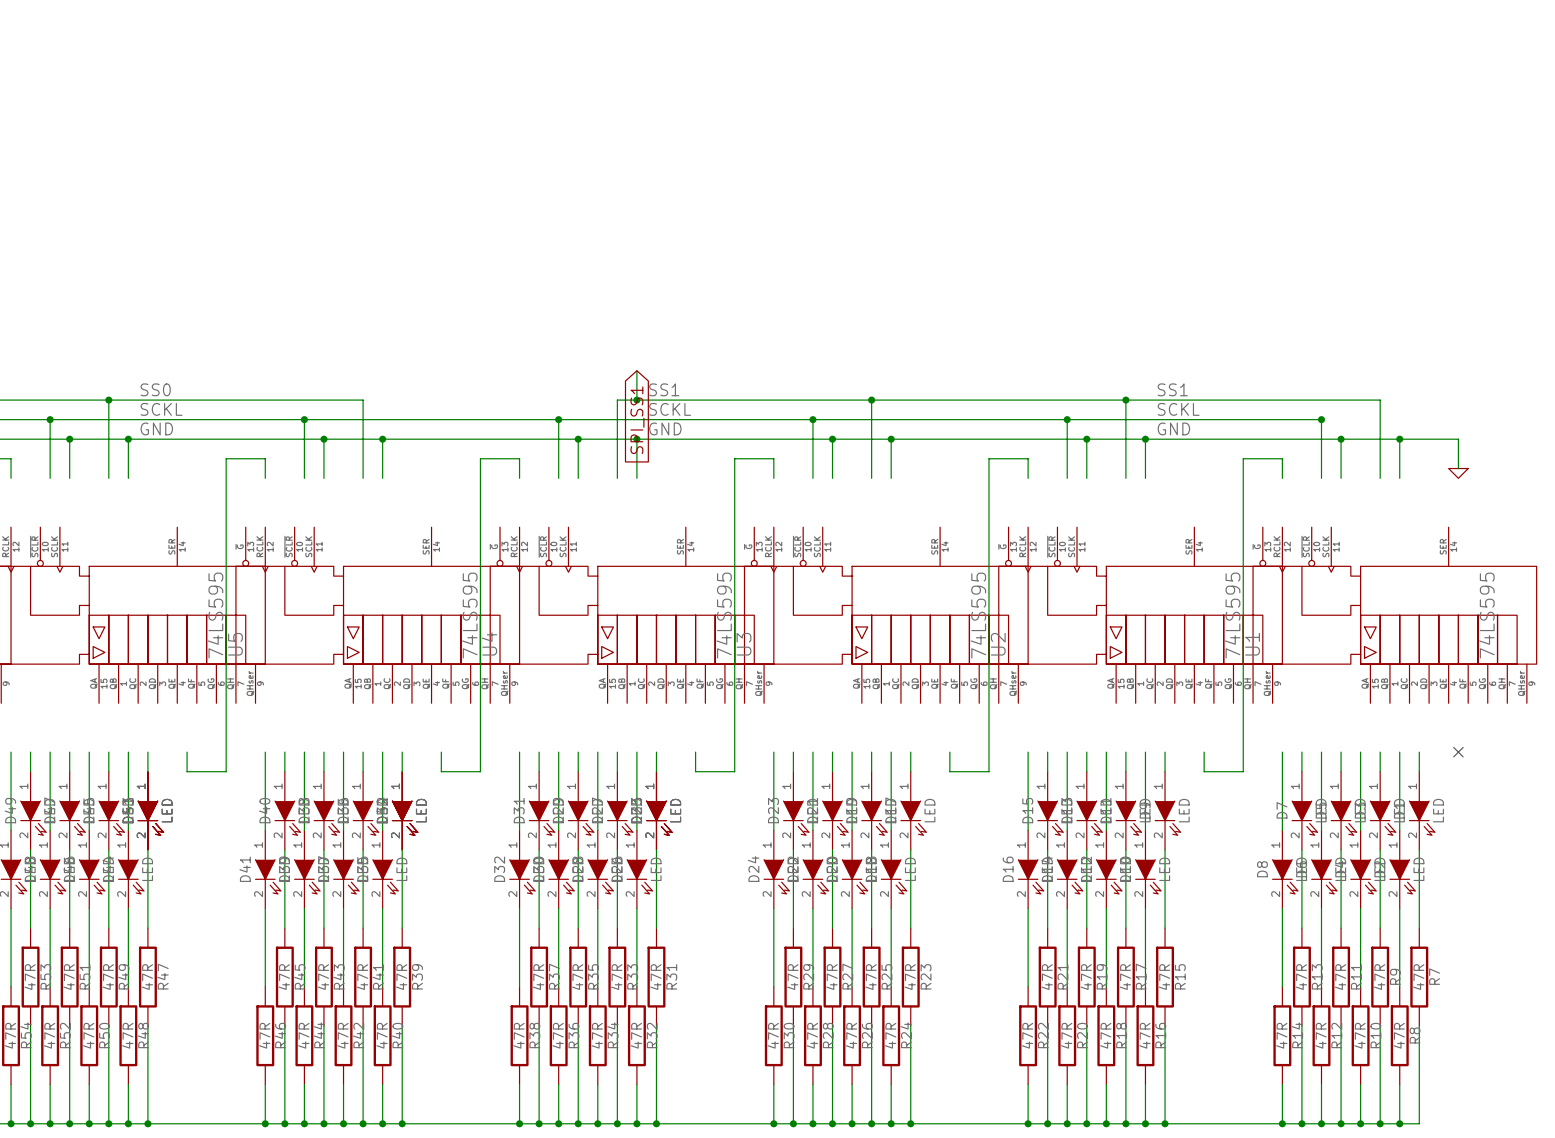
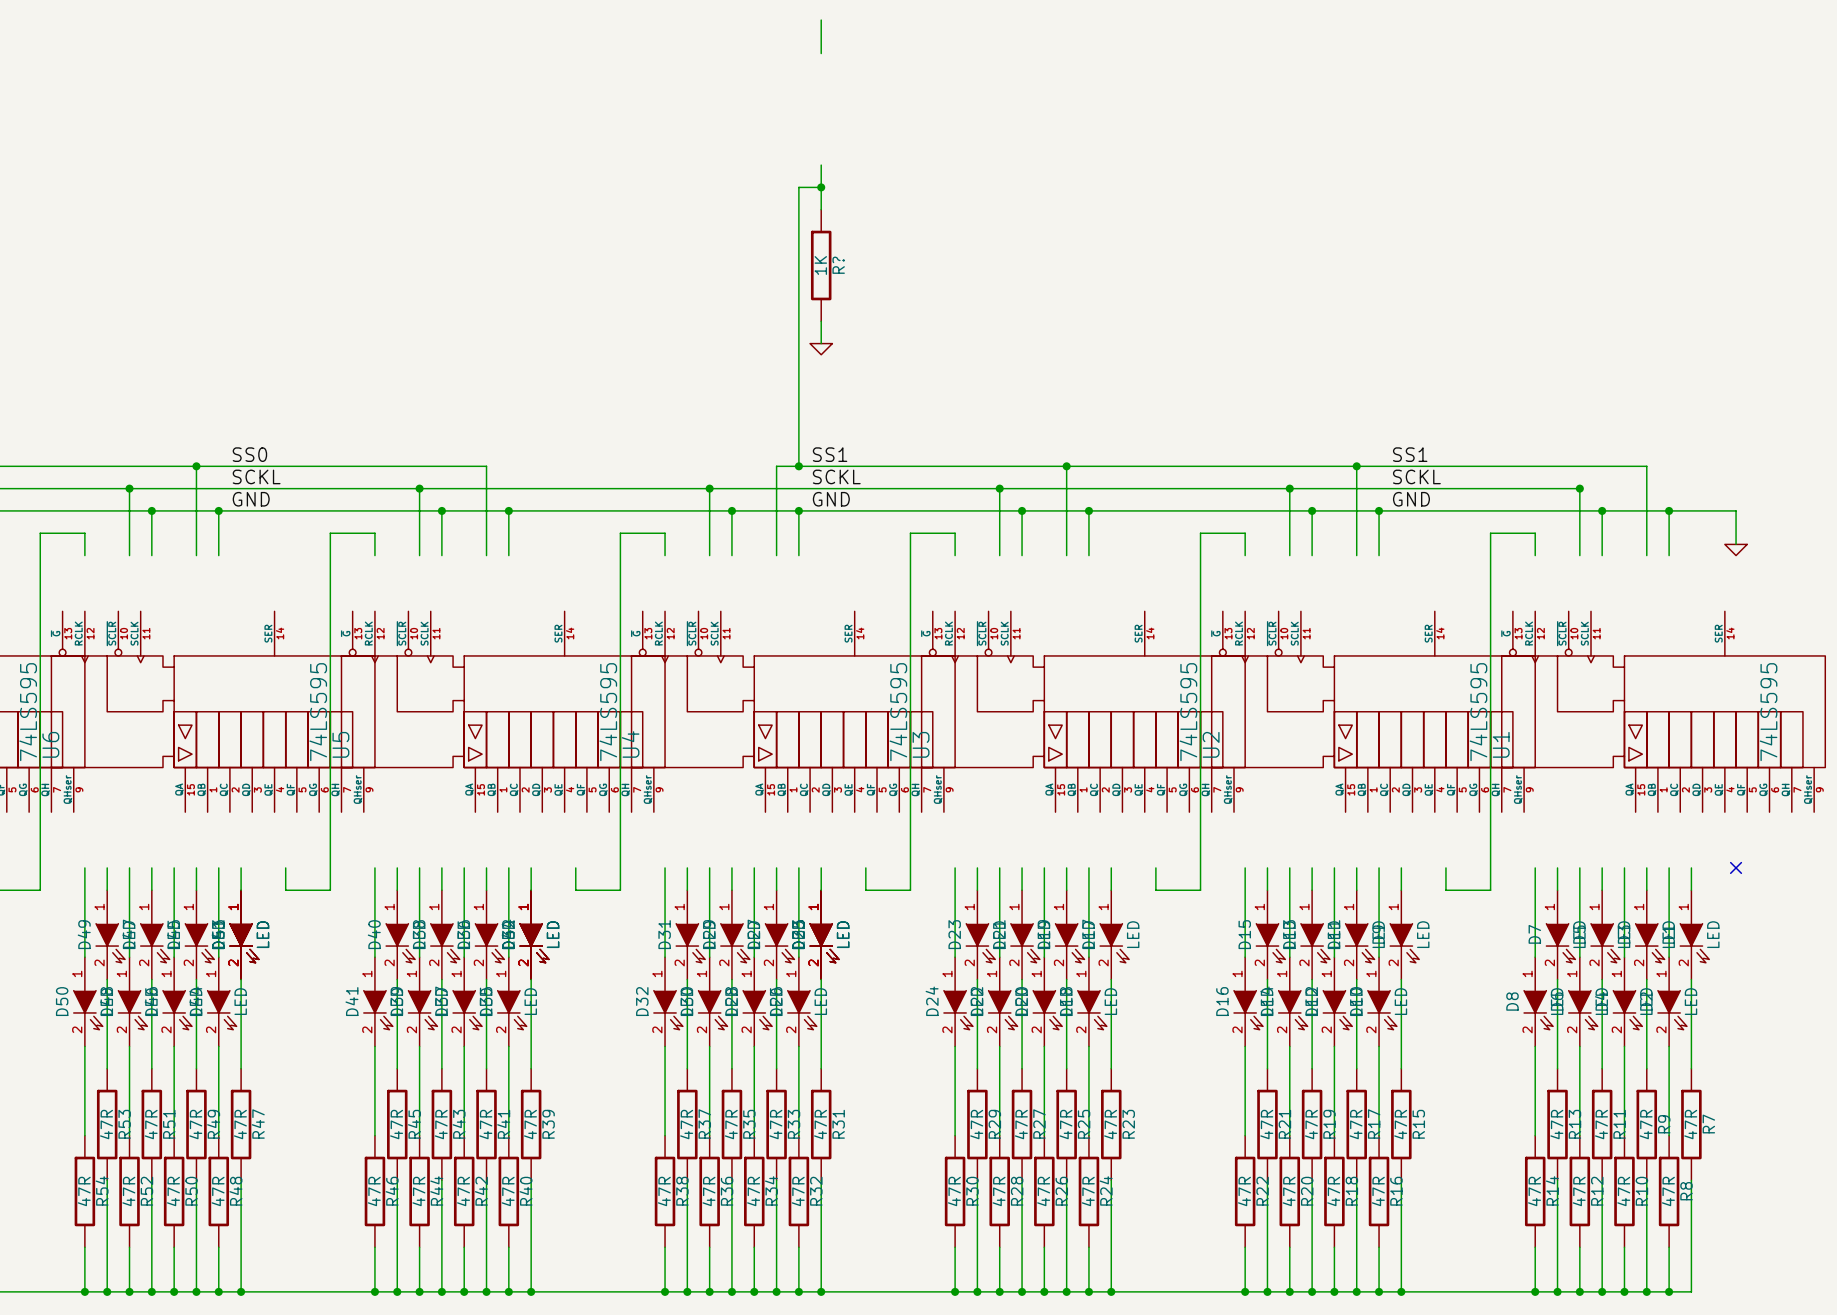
wire: none -> (821, 20) (821, 53)
wire: none -> (821, 165) (821, 209)
wire: none -> (821, 187) (798, 187) (798, 432)
junction: none -> (821, 187)
R?: none -> 1K (821, 265)
wire: none -> (821, 321) (821, 343)
power symbol: none -> (821, 349)
global label: SPI_SS1 (637, 420) -> none

